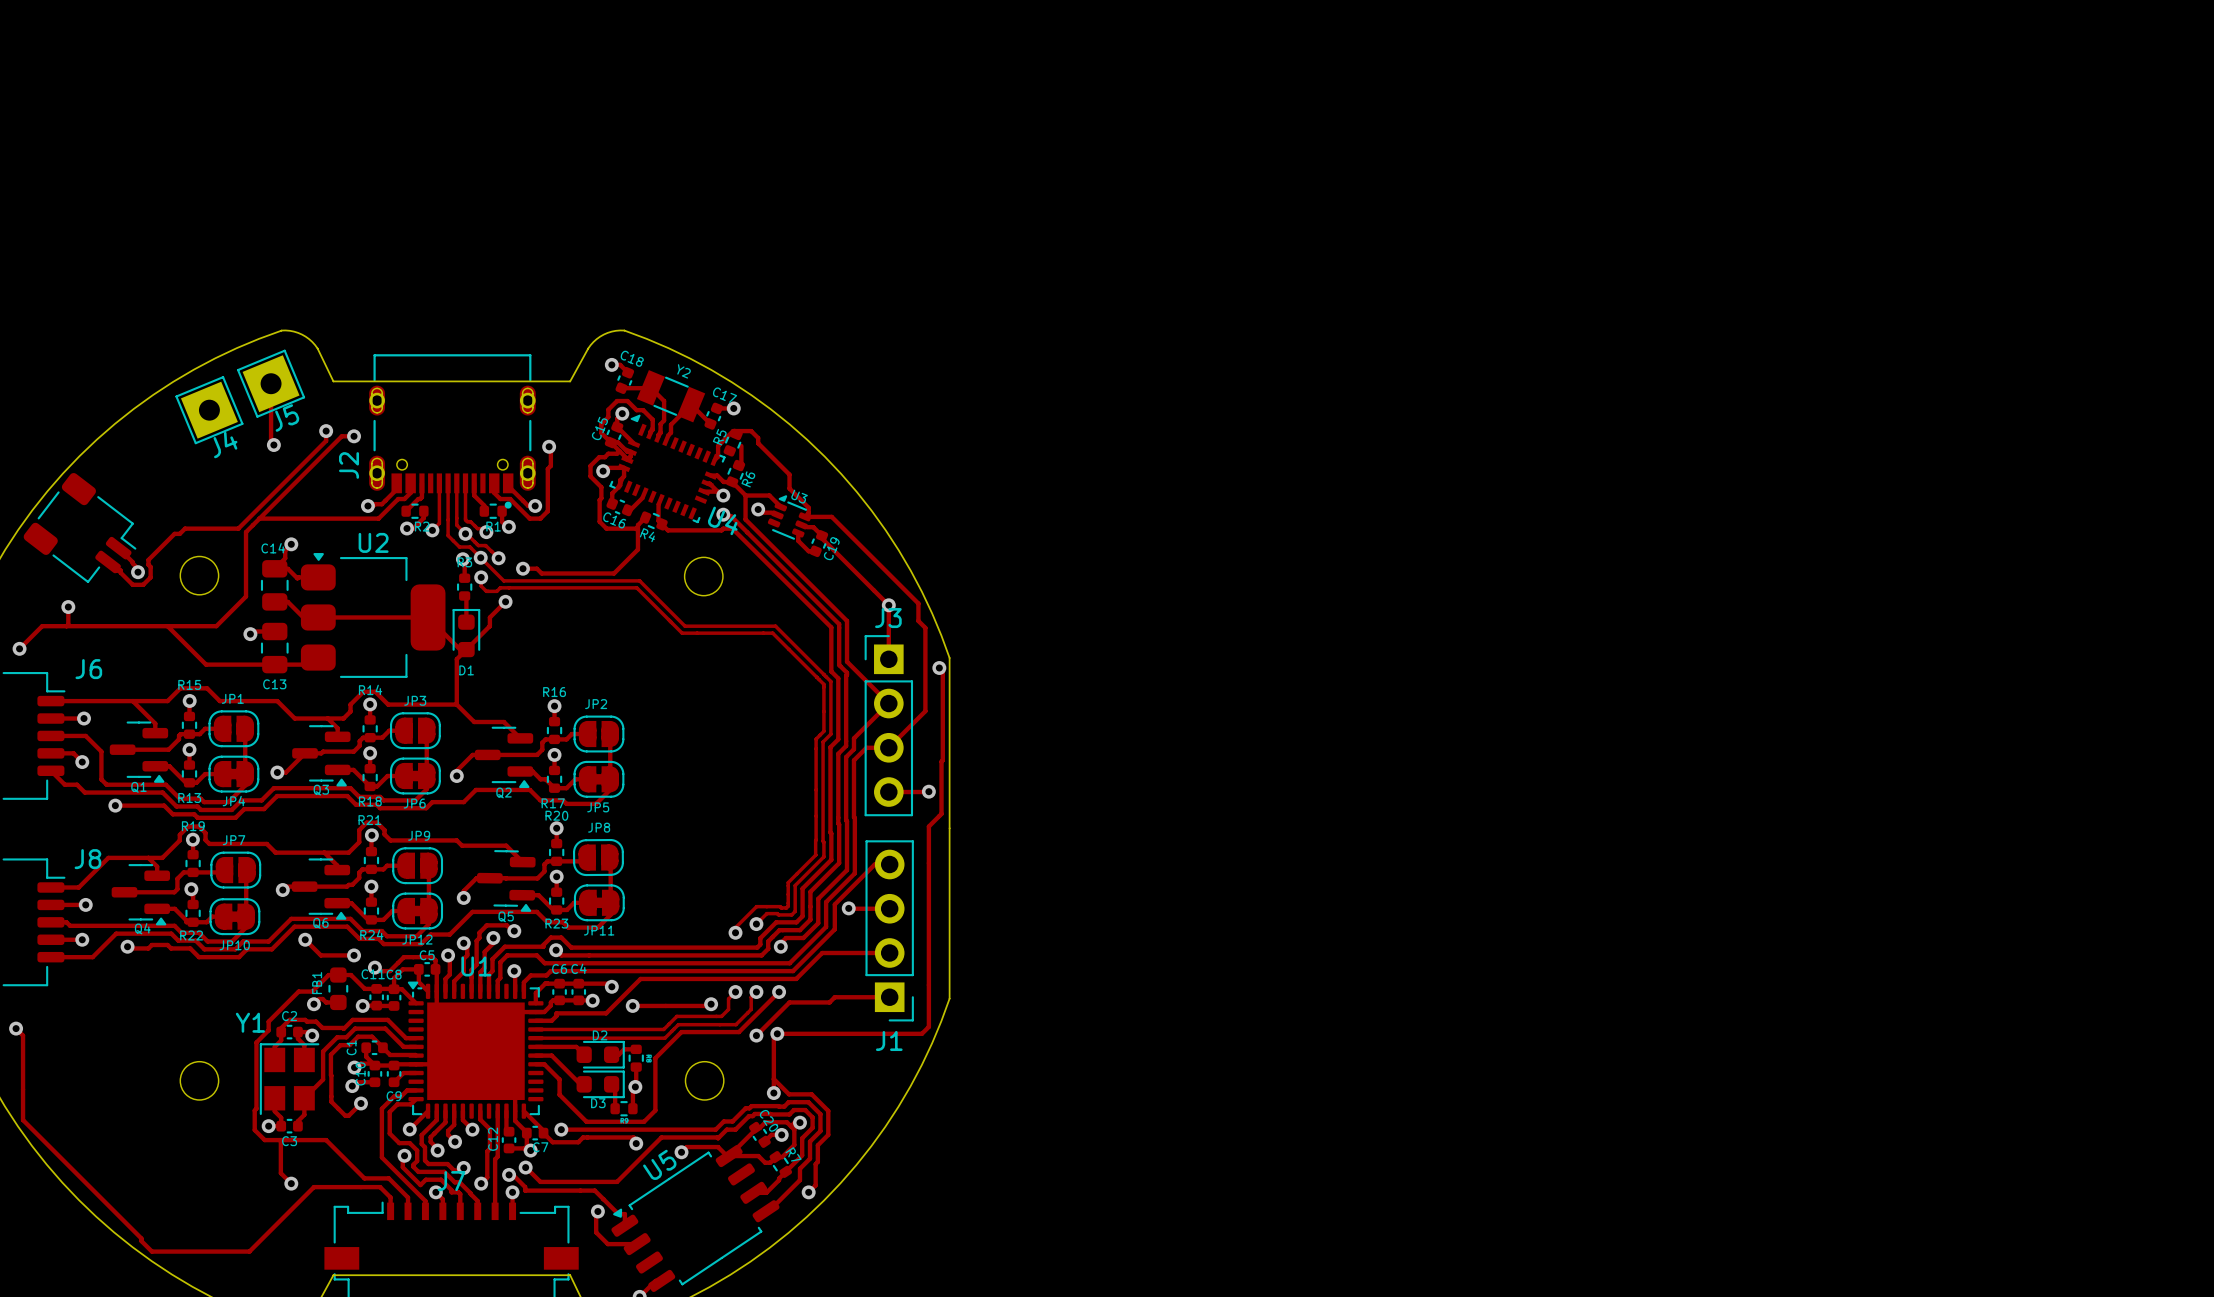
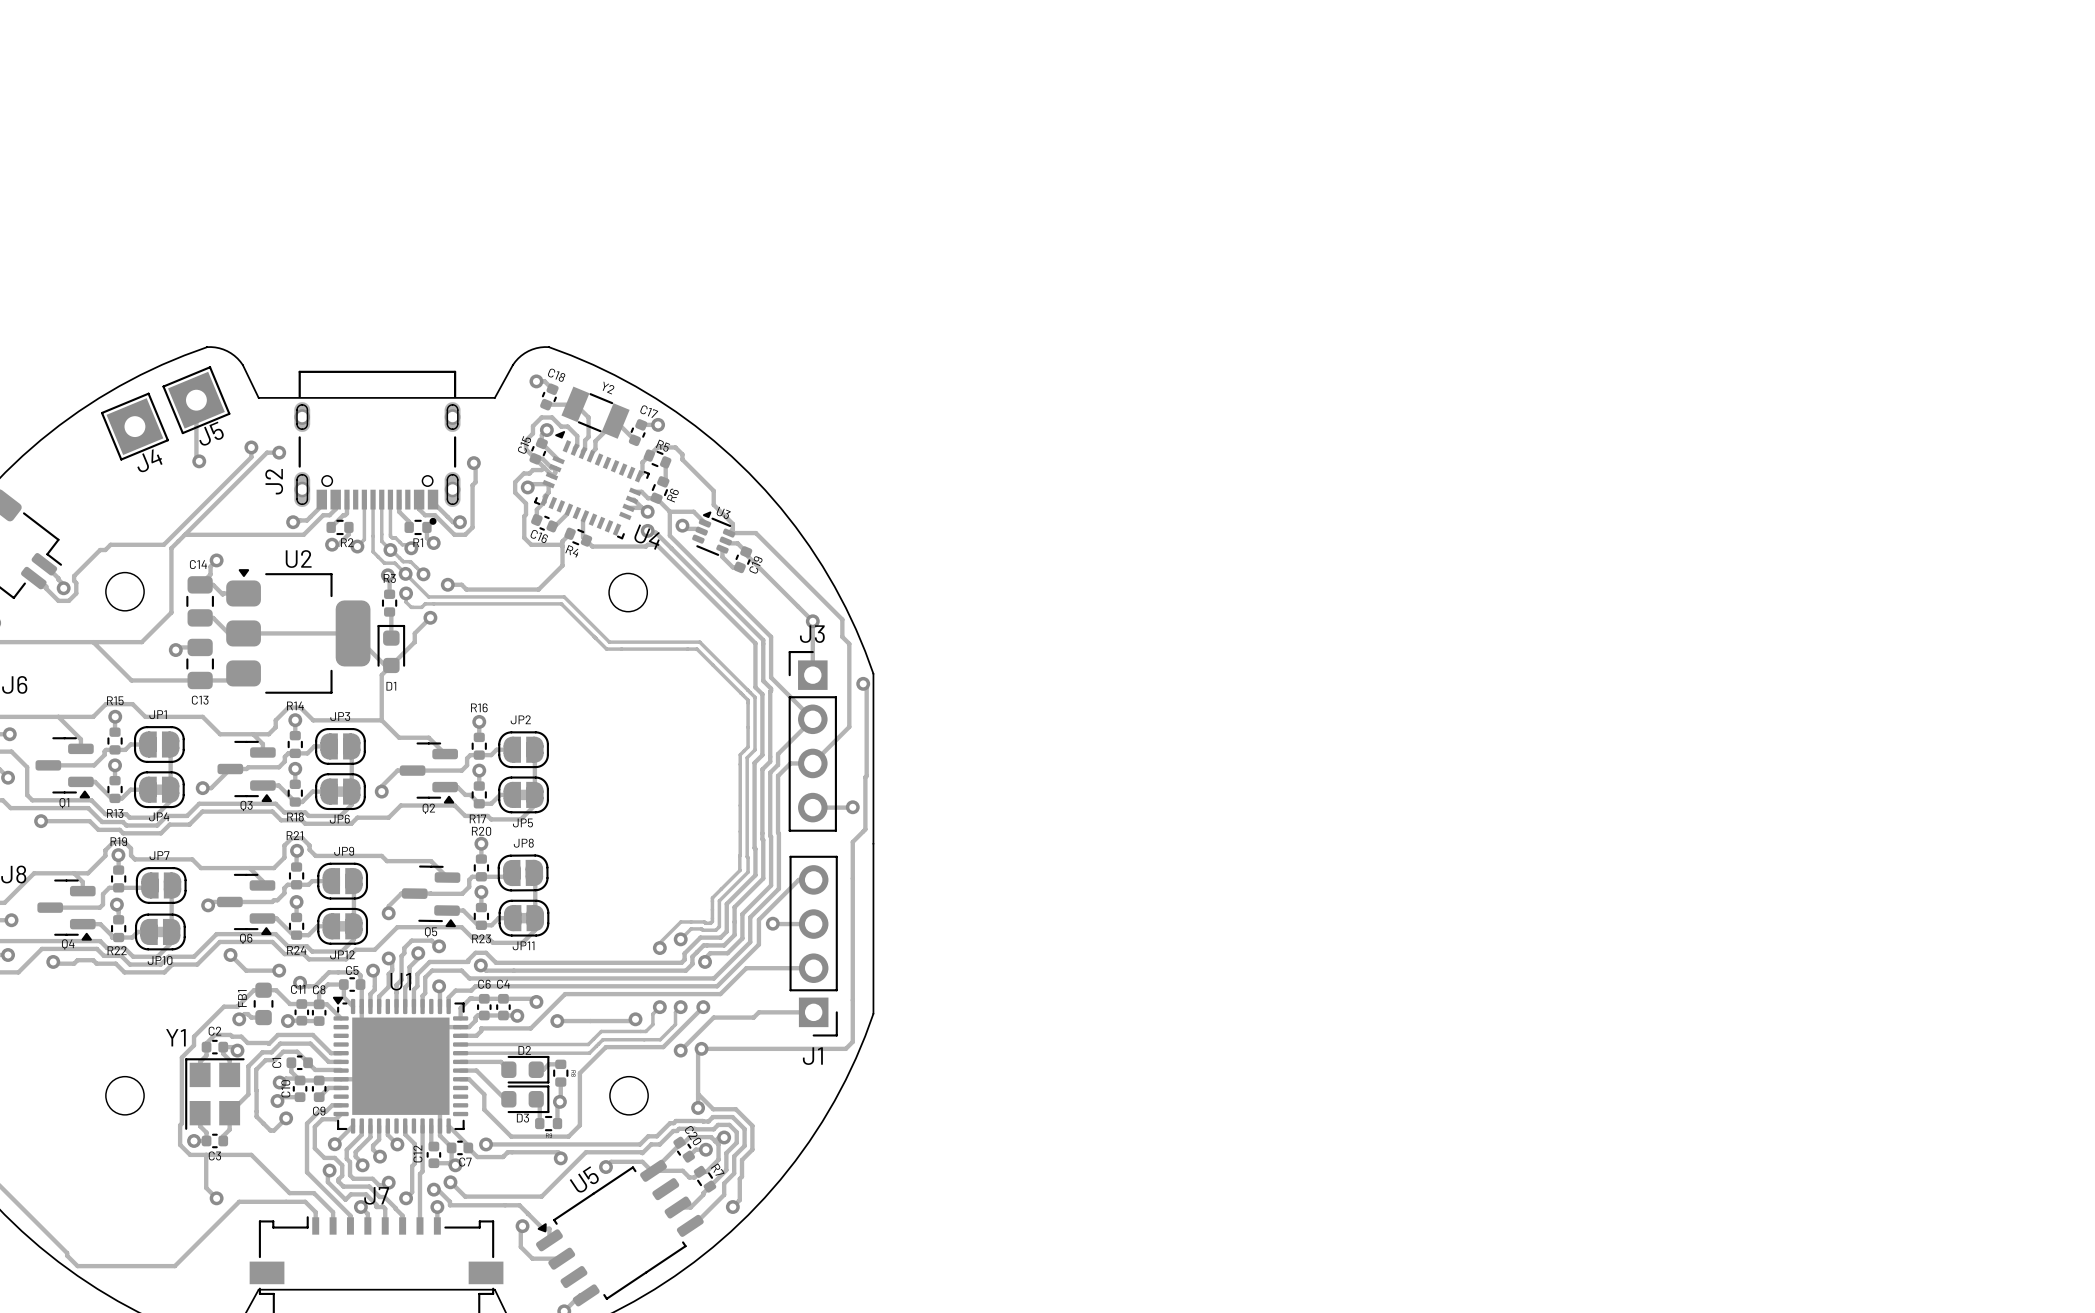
R5 rotation: 0° (733, 442) -> 90° clockwise (657, 458)

